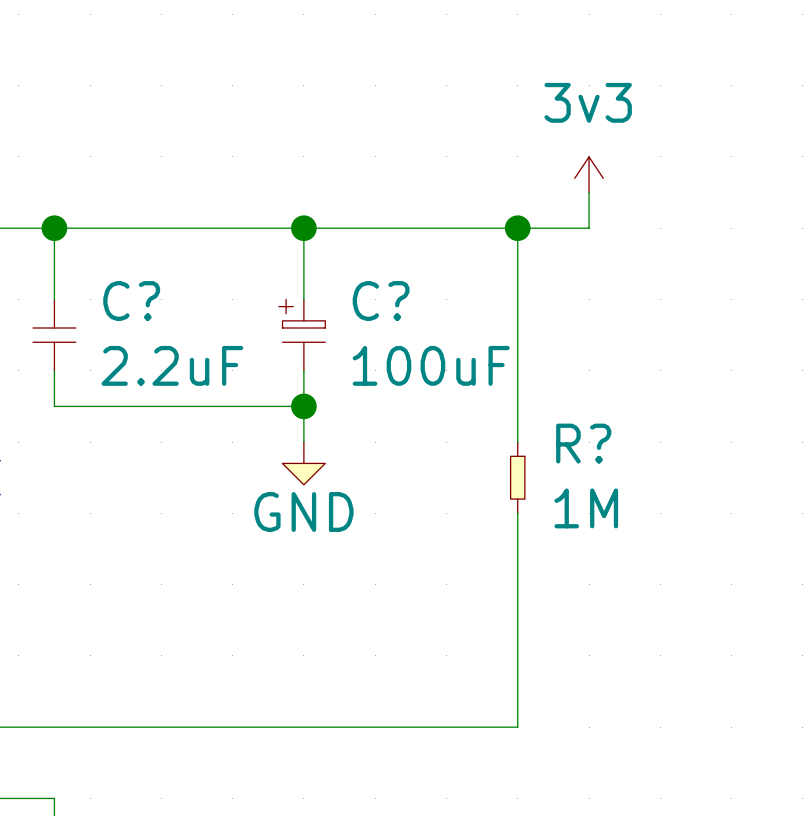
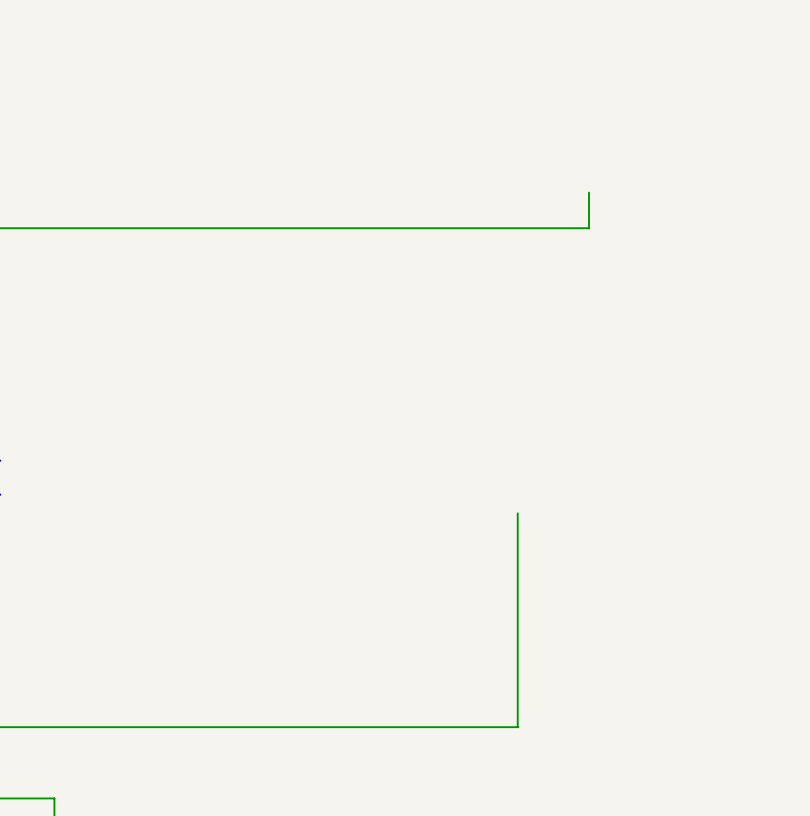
power symbol: 3v3 (589, 174) -> none
wire: (54, 228) (54, 299) -> none
junction: (54, 228) -> none
wire: (303, 228) (303, 299) -> none
junction: (303, 228) -> none
wire: (517, 228) (517, 442) -> none
junction: (517, 228) -> none
C?: 2.2uF (54, 335) -> none
C?: 100uF (302, 335) -> none
wire: (54, 370) (54, 406) (303, 406) -> none
wire: (303, 370) (303, 442) -> none
junction: (303, 406) -> none
power symbol: GND (303, 463) -> none
R?: 1M (517, 477) -> none

